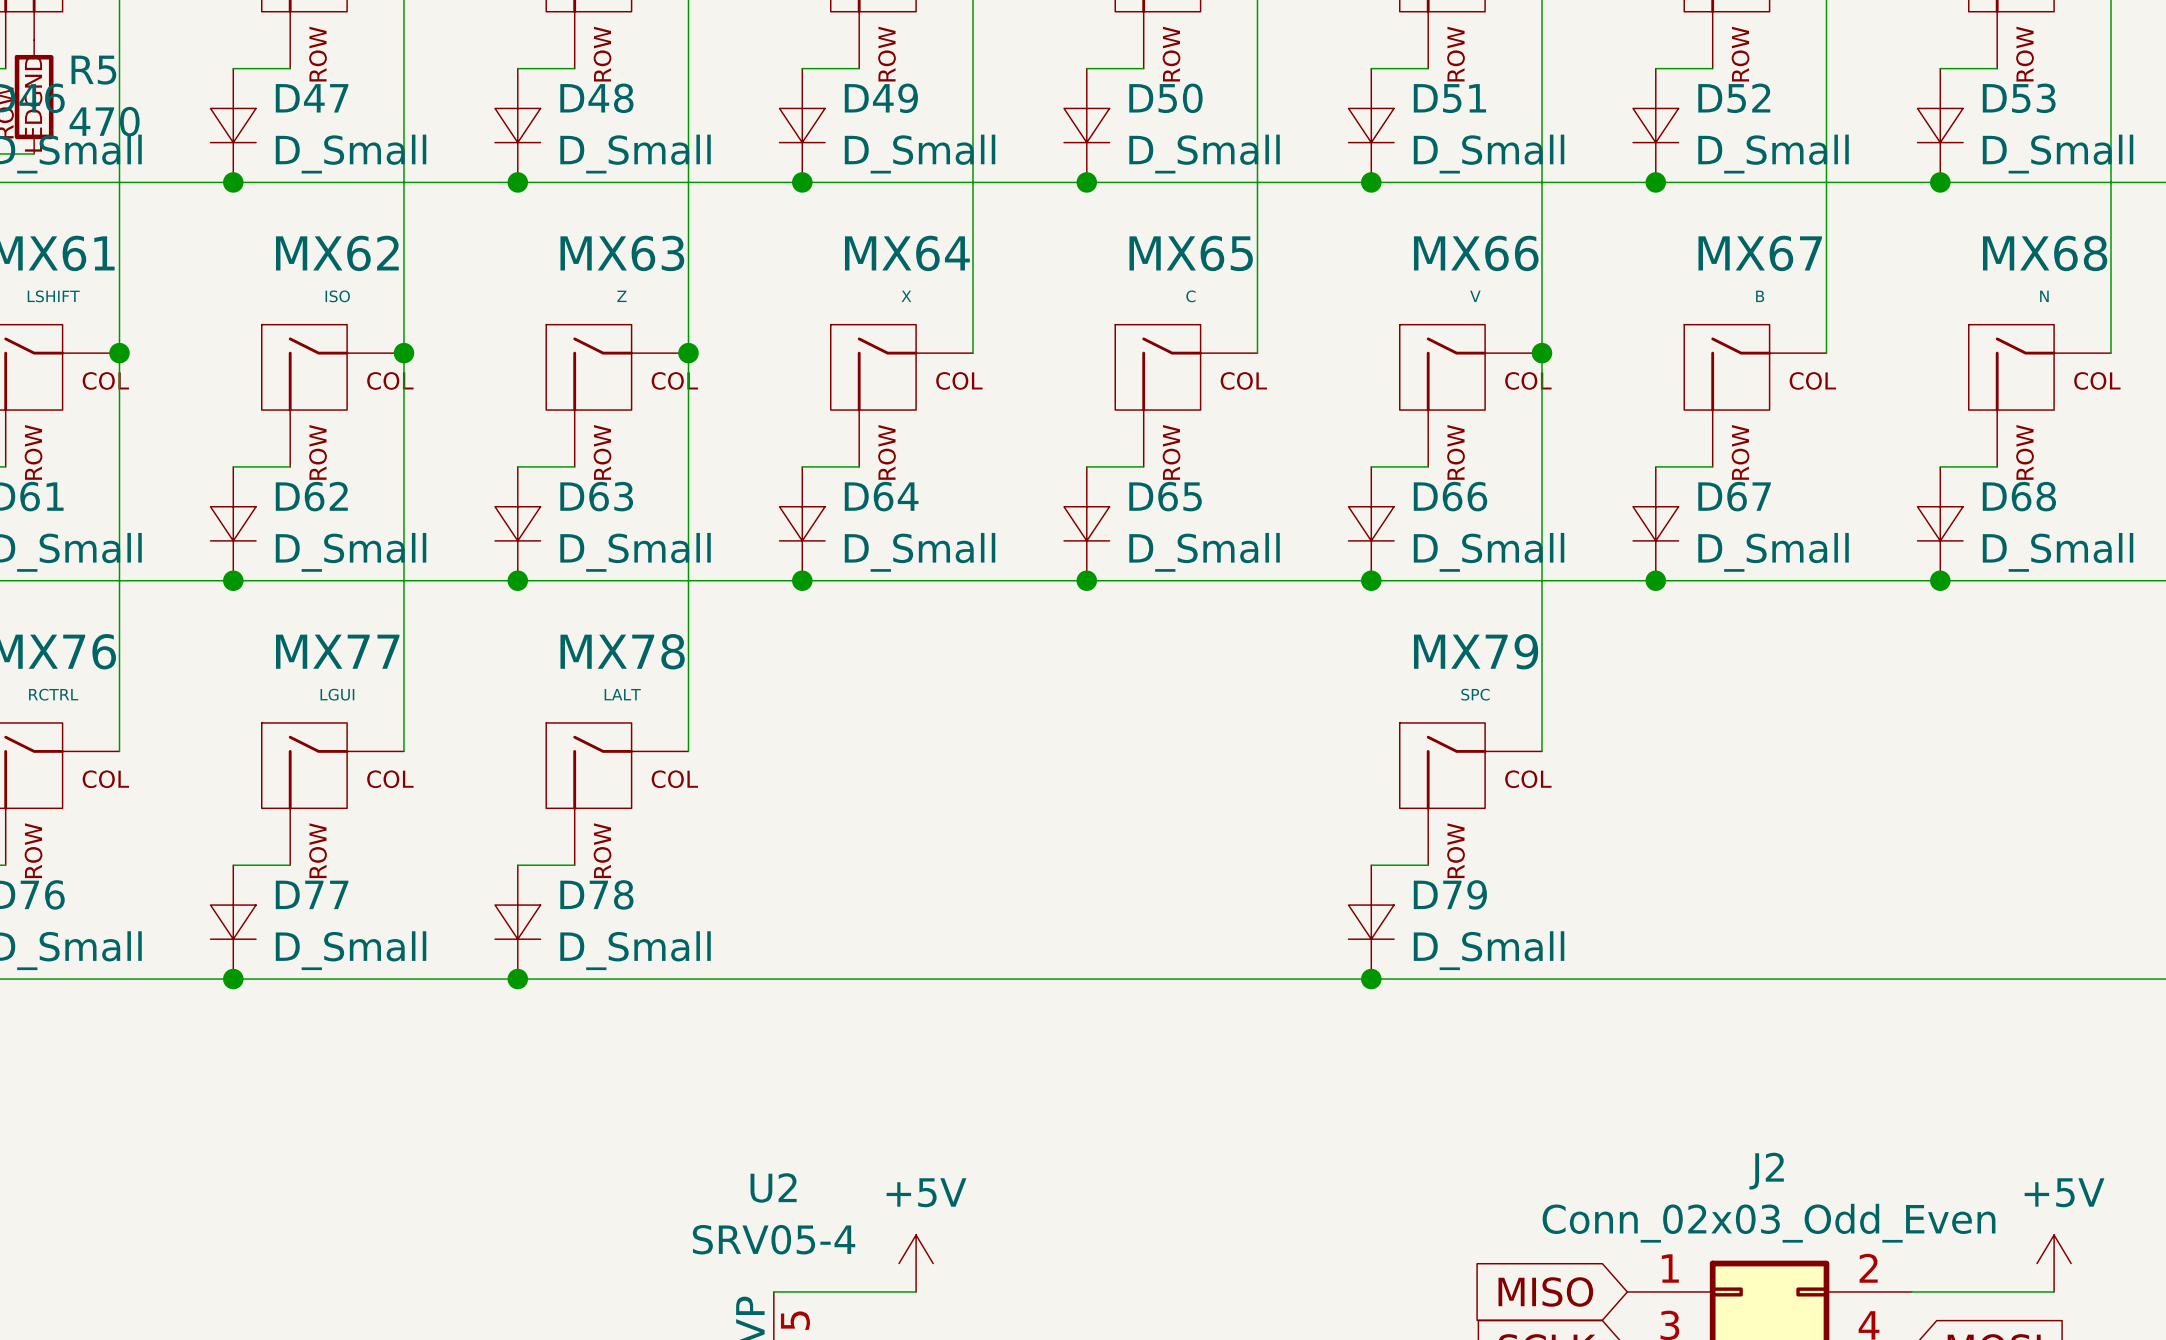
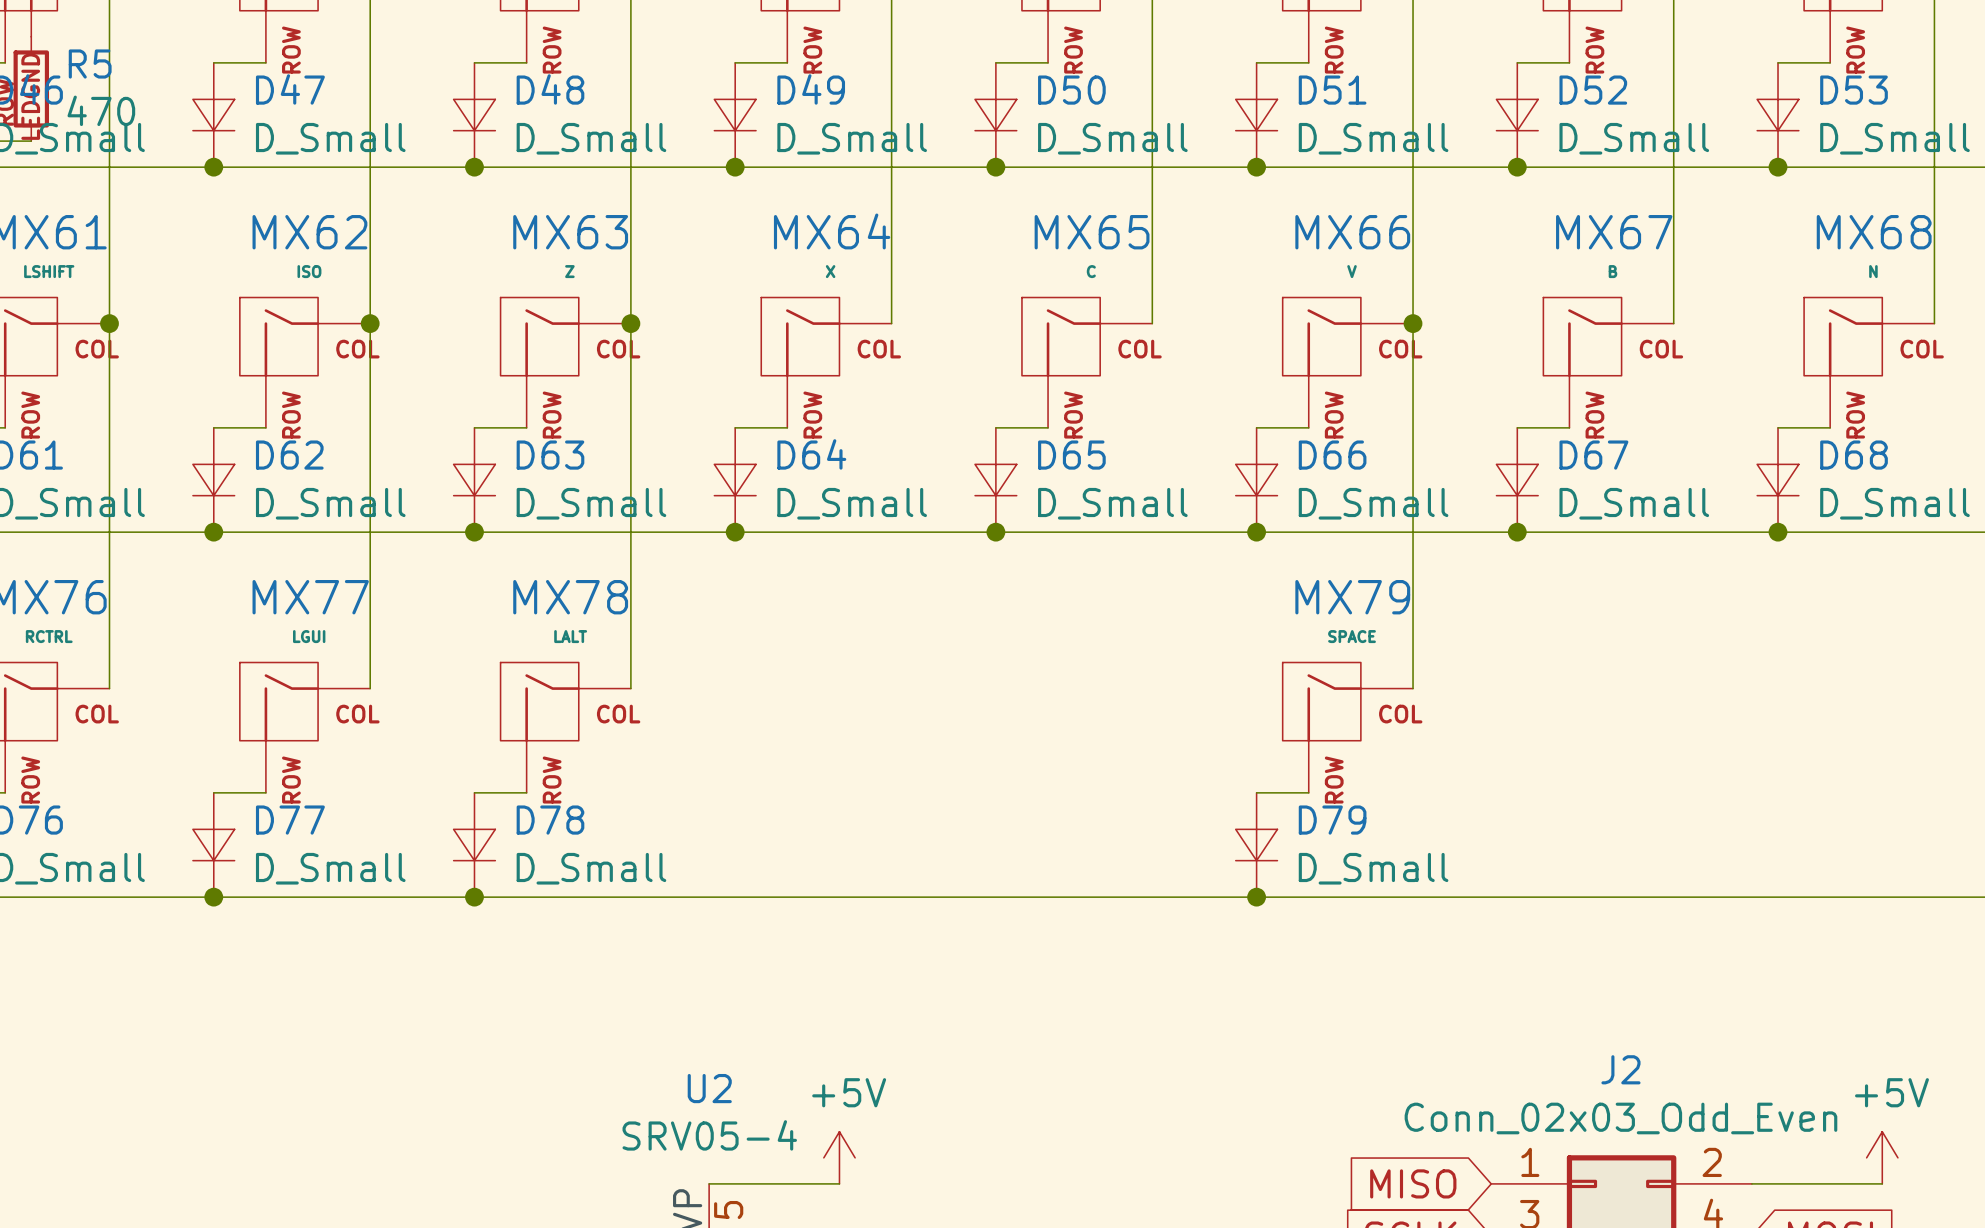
MX79 value: SPC (1475, 694) -> SPACE (1352, 636)

